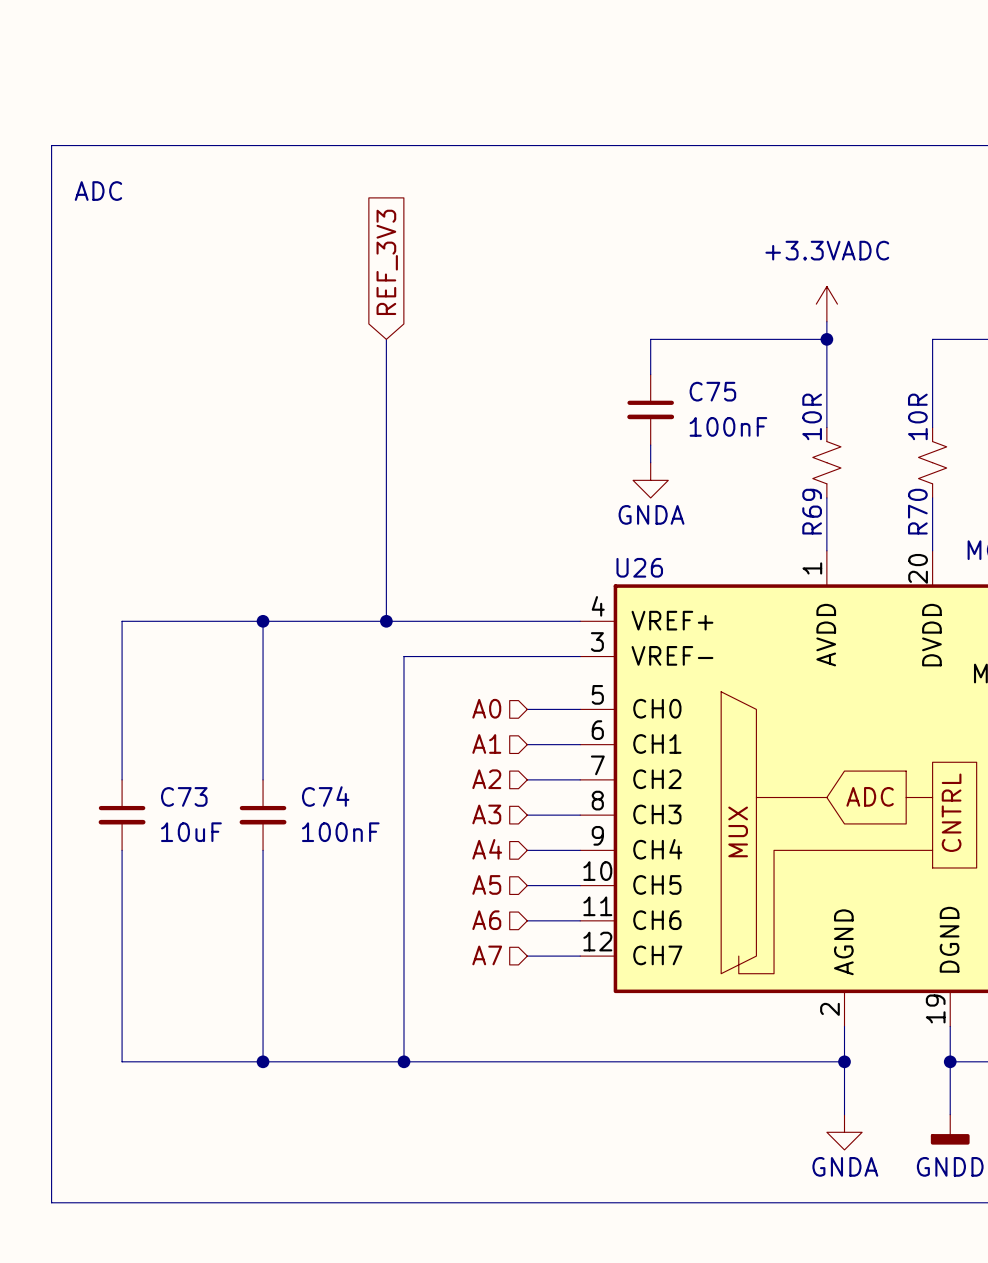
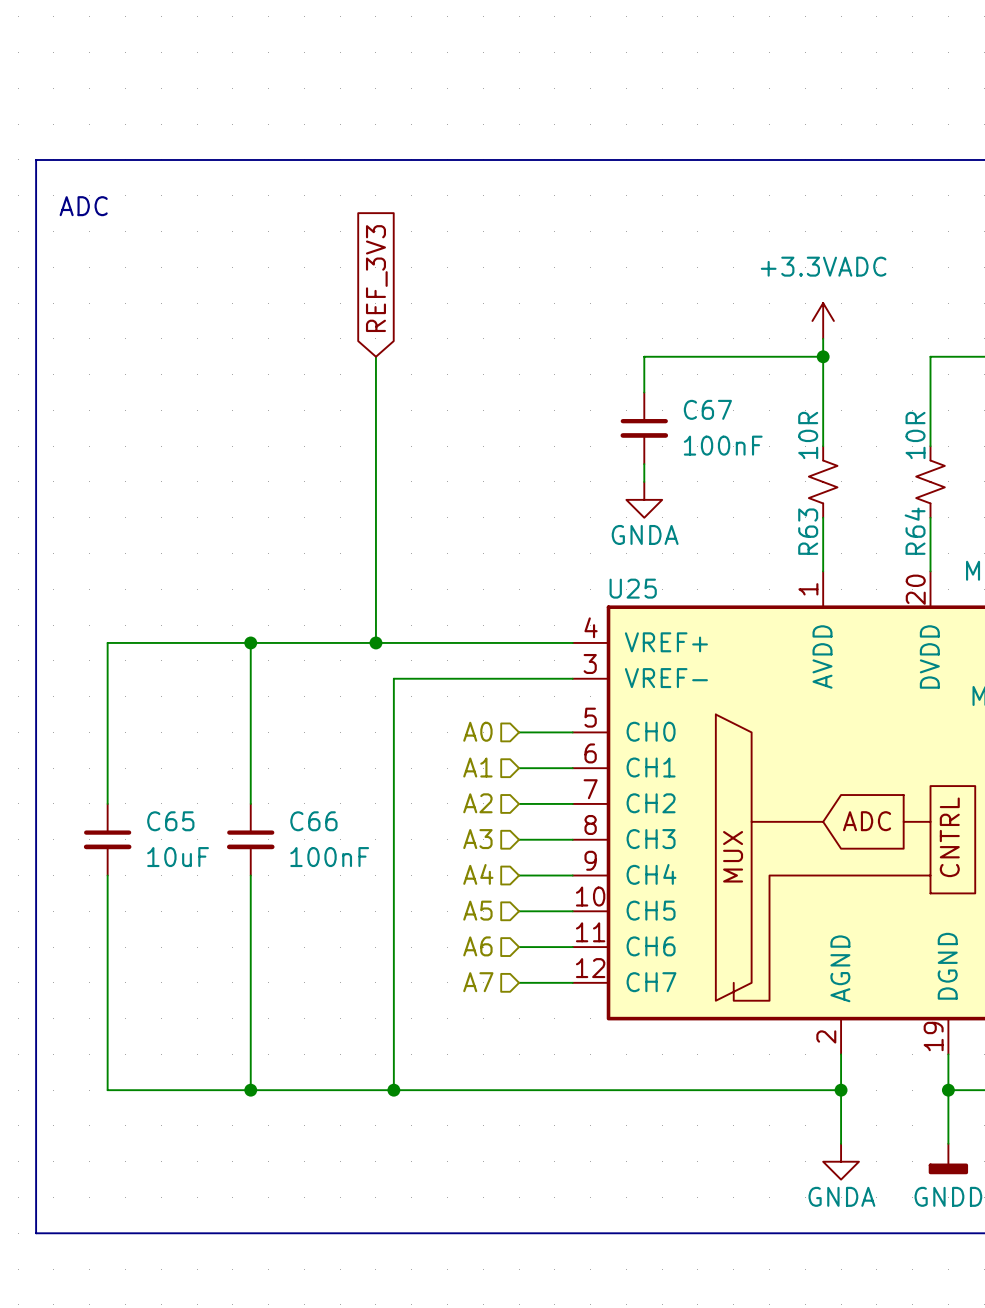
C75 name: C75 (712, 391) -> C67 (707, 409)
R69 name: R69 (812, 511) -> R63 (808, 531)
R70 name: R70 (917, 511) -> R64 (915, 531)
U26 name: U26 (639, 567) -> U25 (633, 588)
C73 name: C73 (184, 796) -> C65 (170, 821)
C74 name: C74 (325, 796) -> C66 (313, 821)

